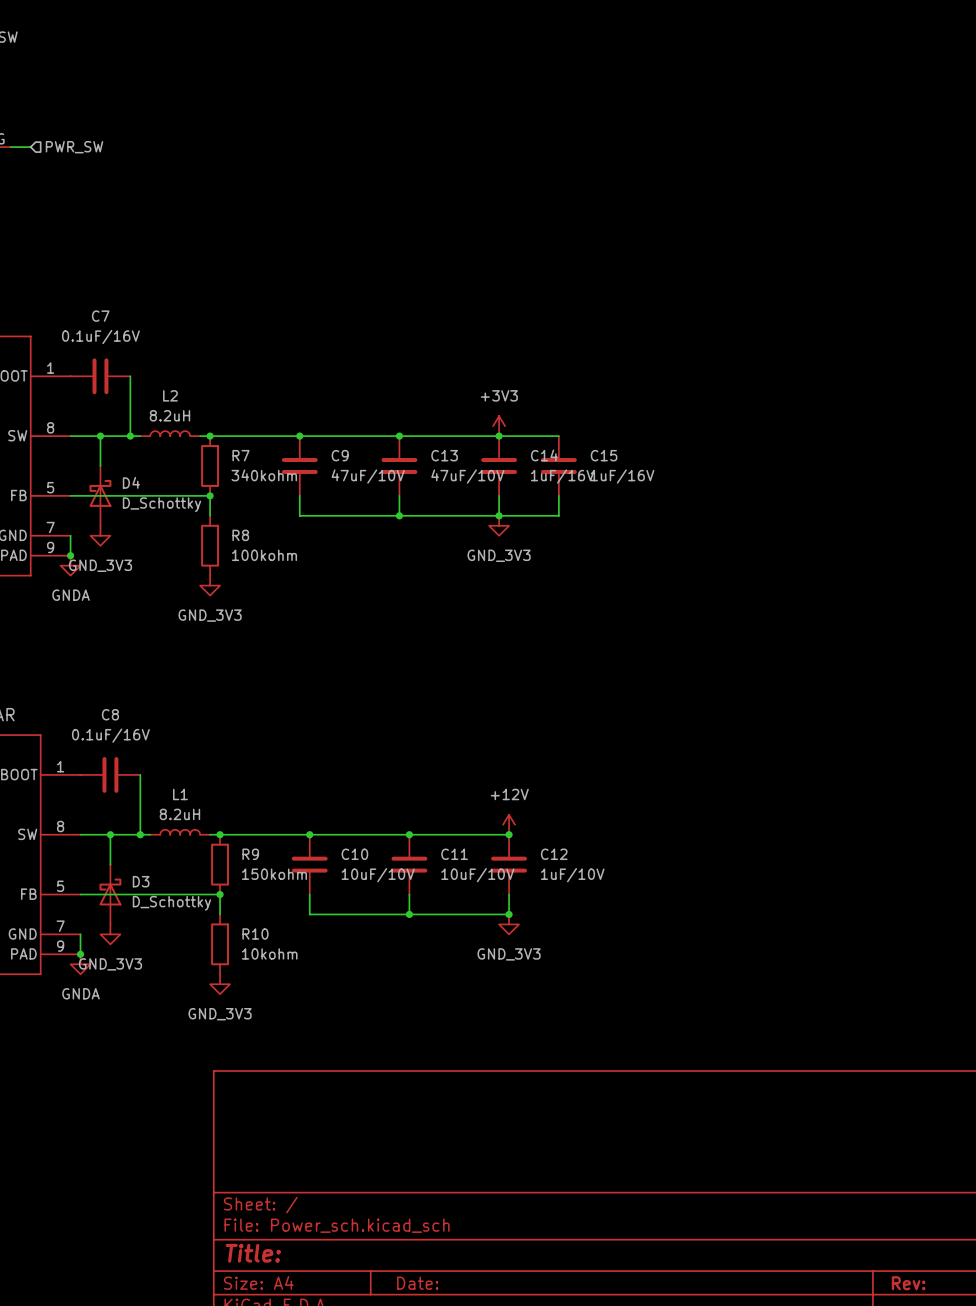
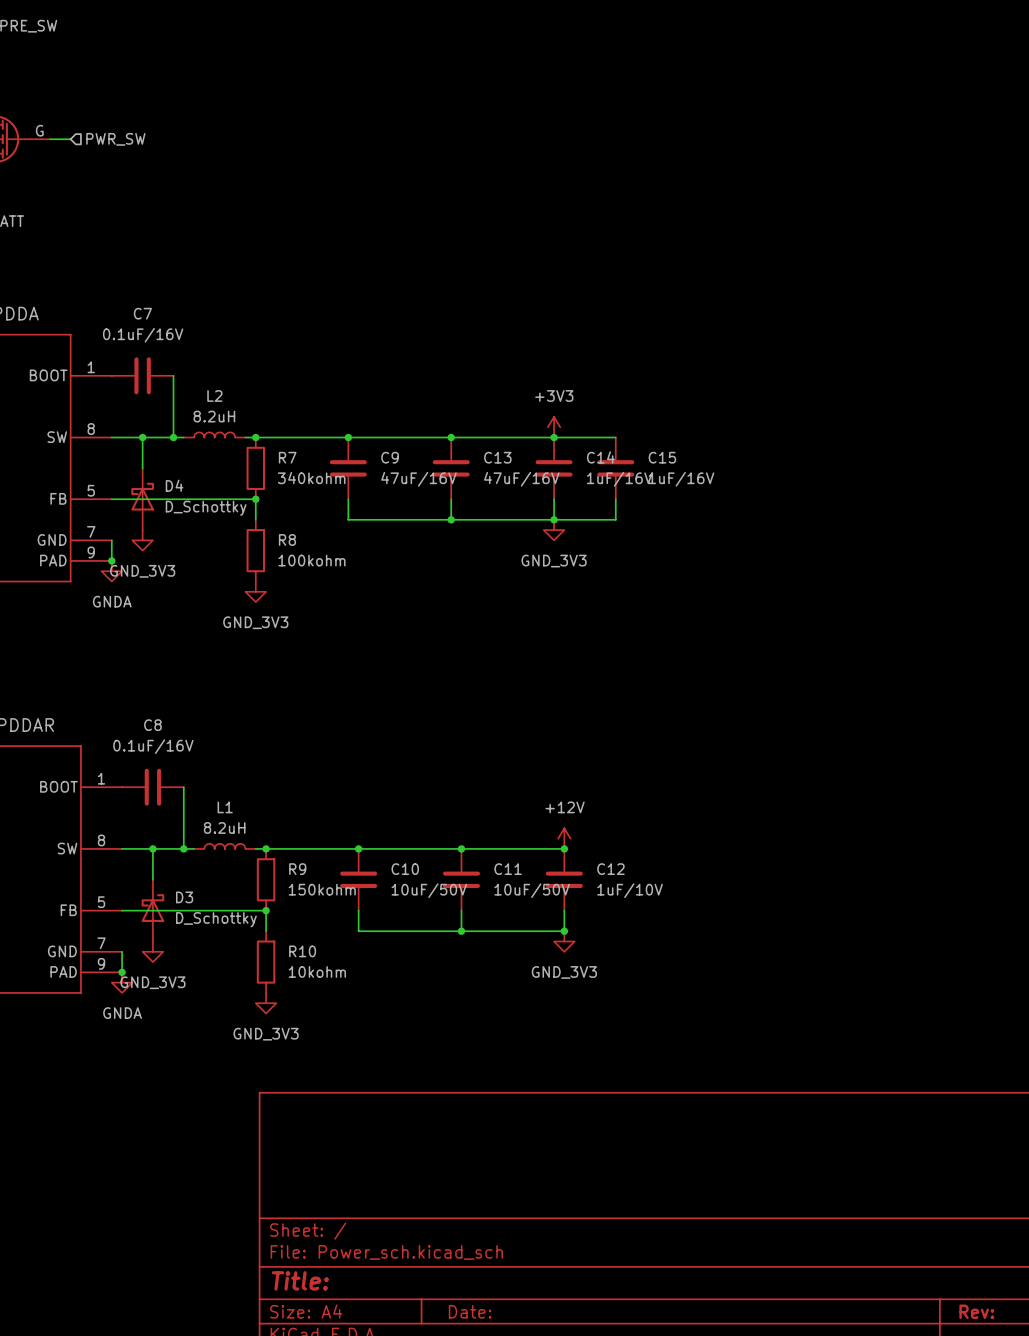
C9 value: 47uF/10V (368, 476) -> 47uF/16V (418, 479)
C13 value: 47uF/10V (467, 476) -> 47uF/16V (521, 479)
C10 value: 10uF/10V (378, 875) -> 10uF/50V (429, 890)
C11 value: 10uF/10V (477, 875) -> 10uF/50V (532, 890)

